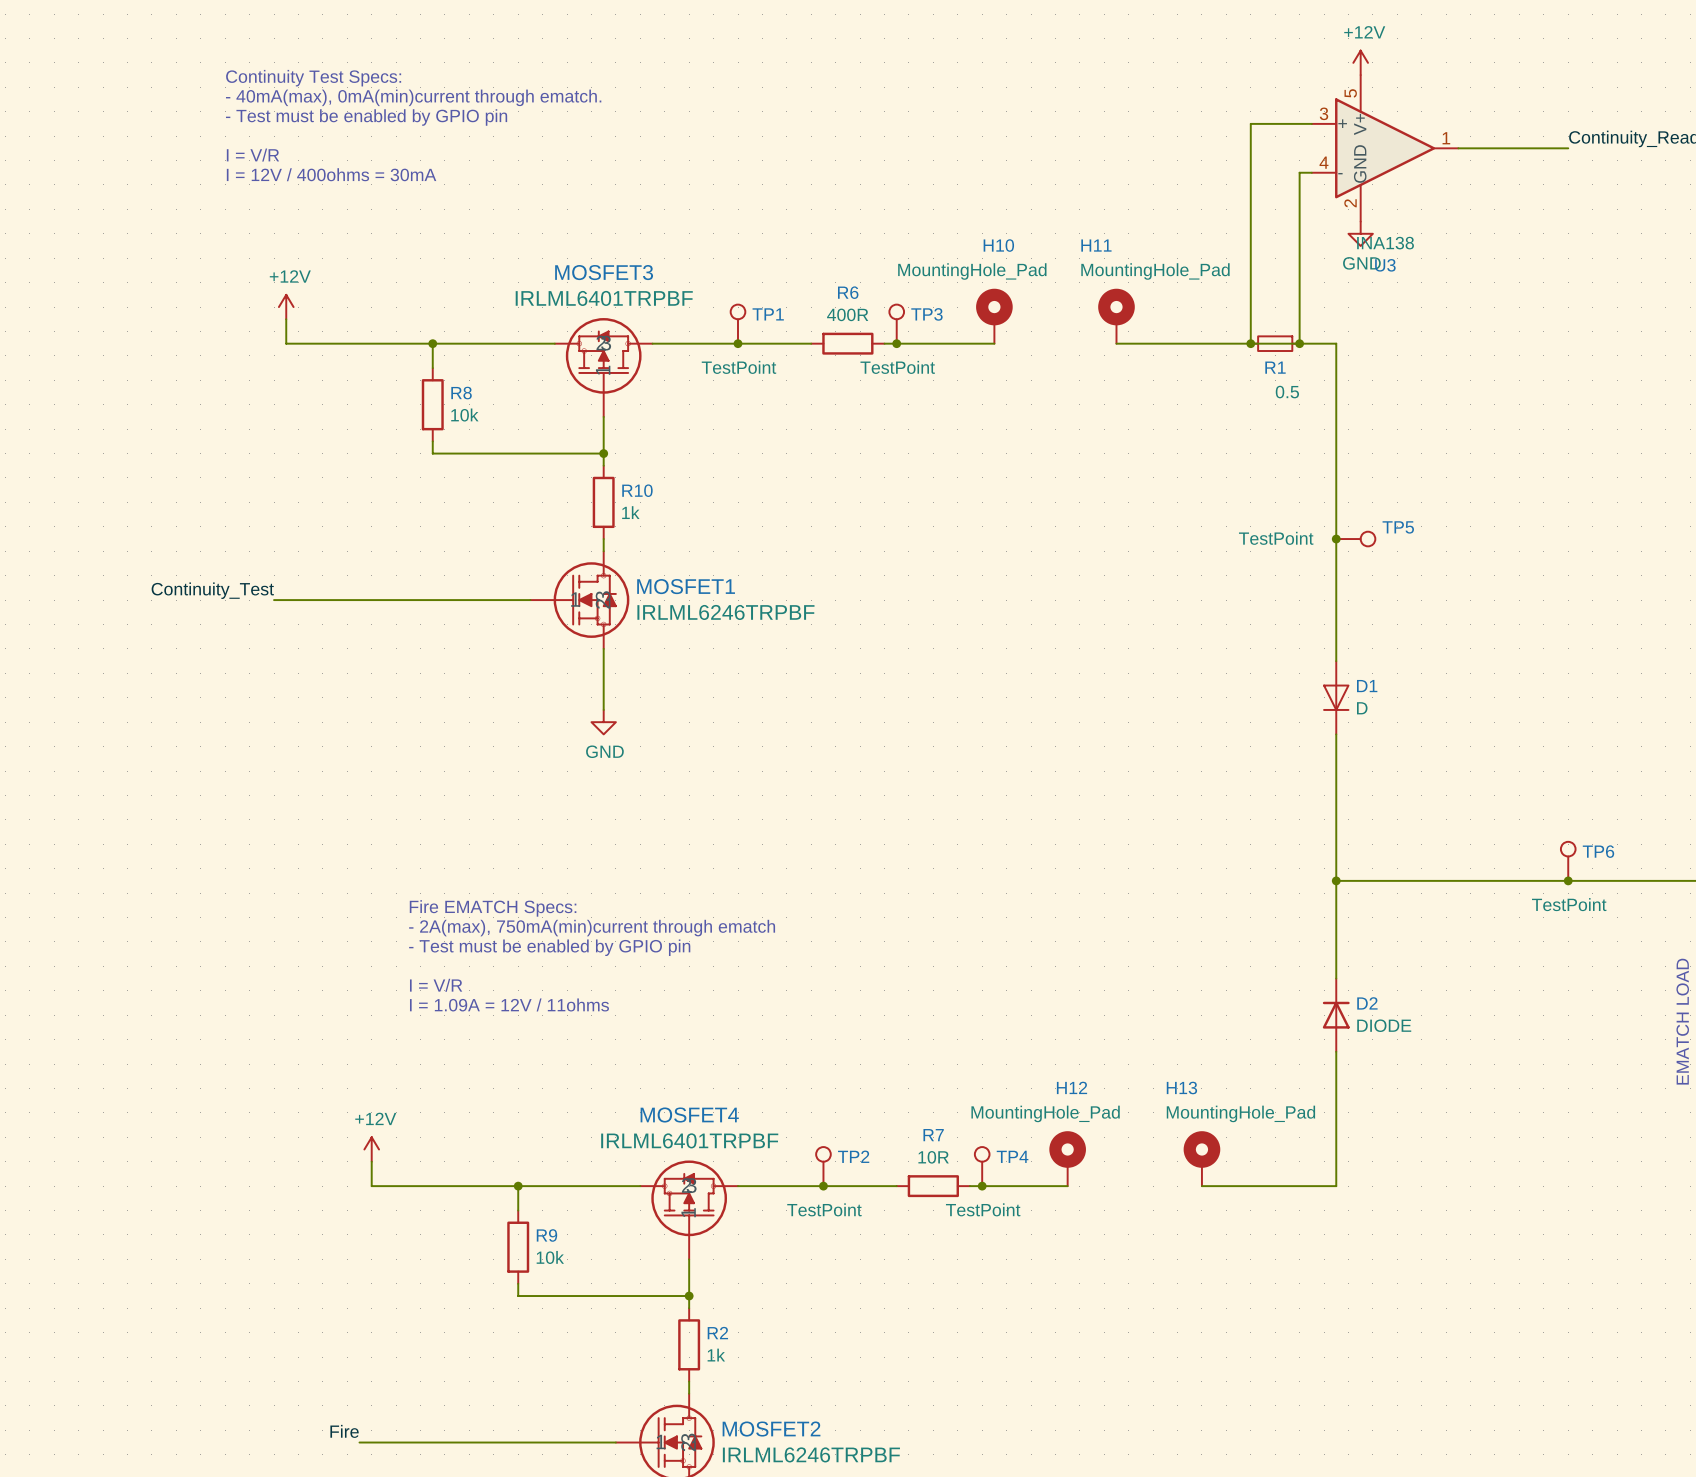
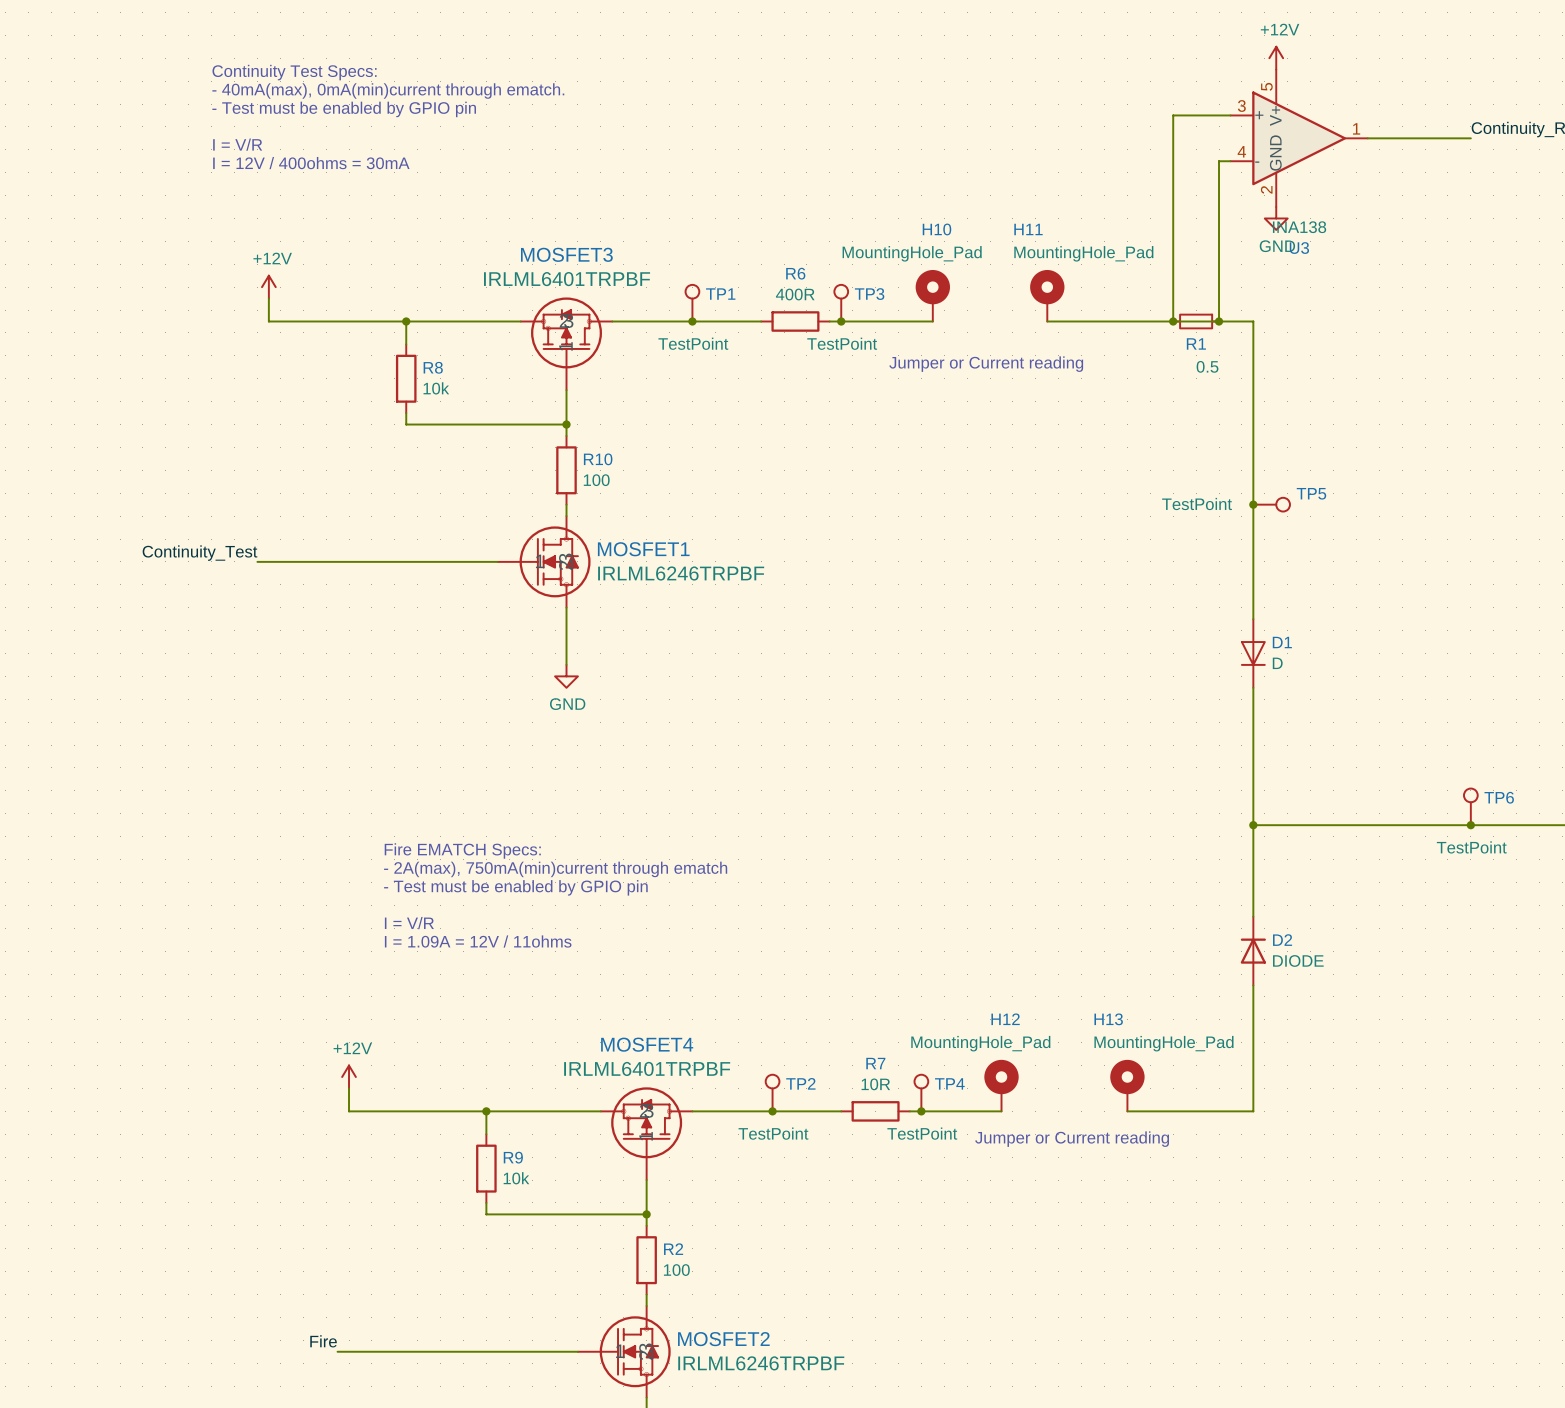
text: none -> Jumper or Current reading (986, 364)
R10 value: 1k (630, 512) -> 100 (596, 480)
text: none -> Jumper or Current reading (1072, 1139)
R2 value: 1k (716, 1355) -> 100 (676, 1270)

